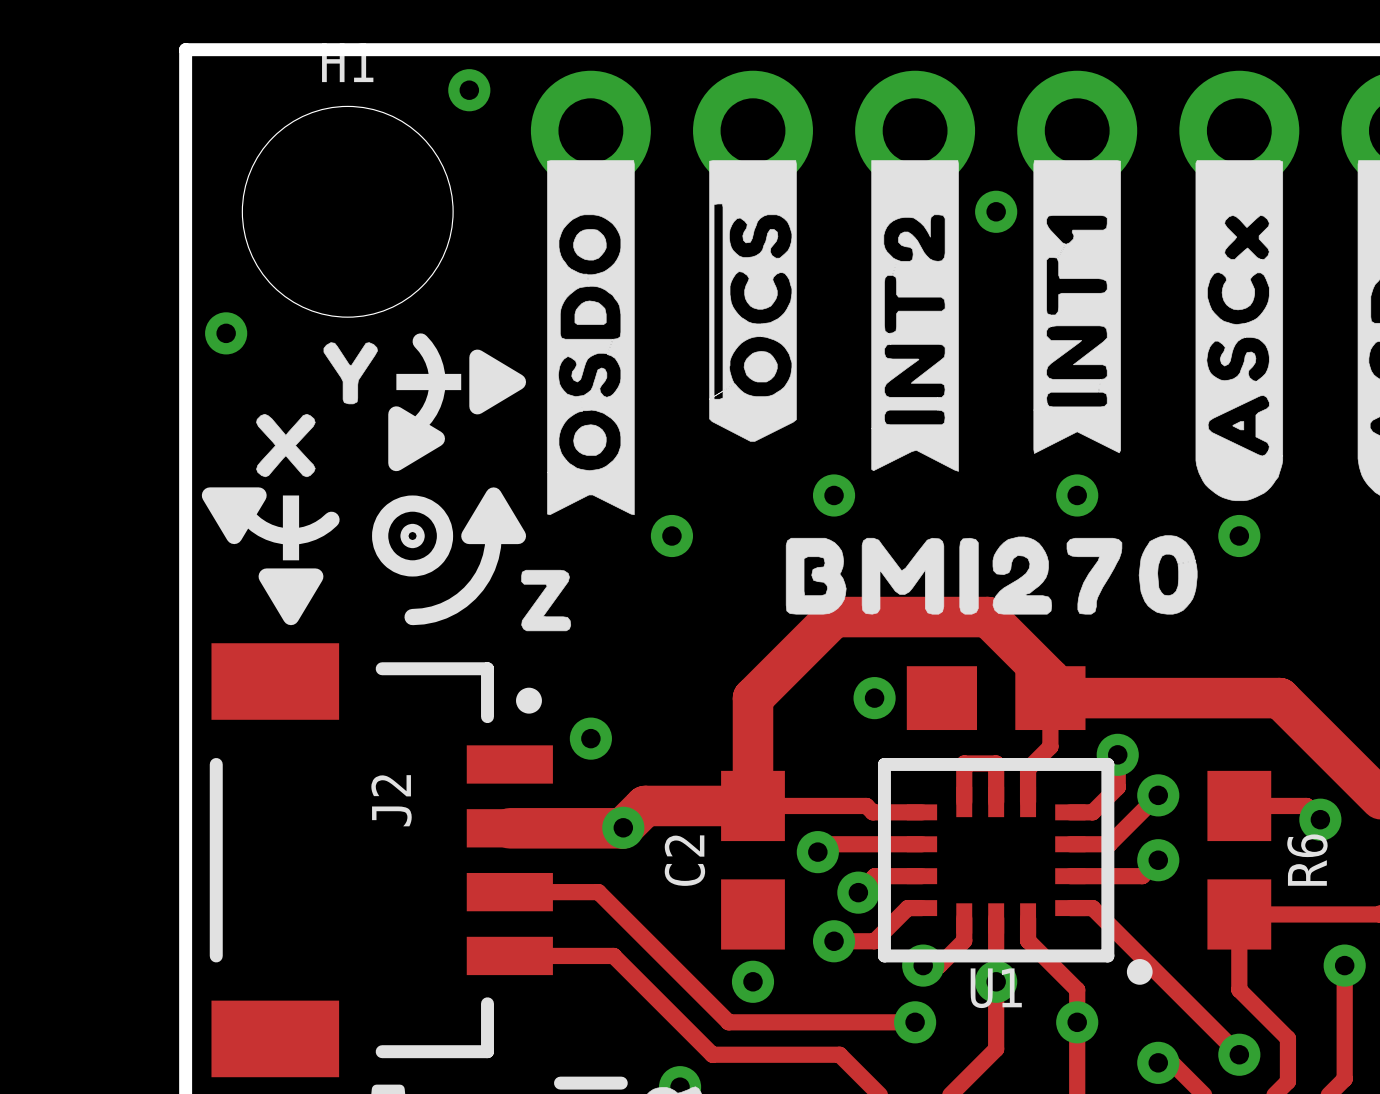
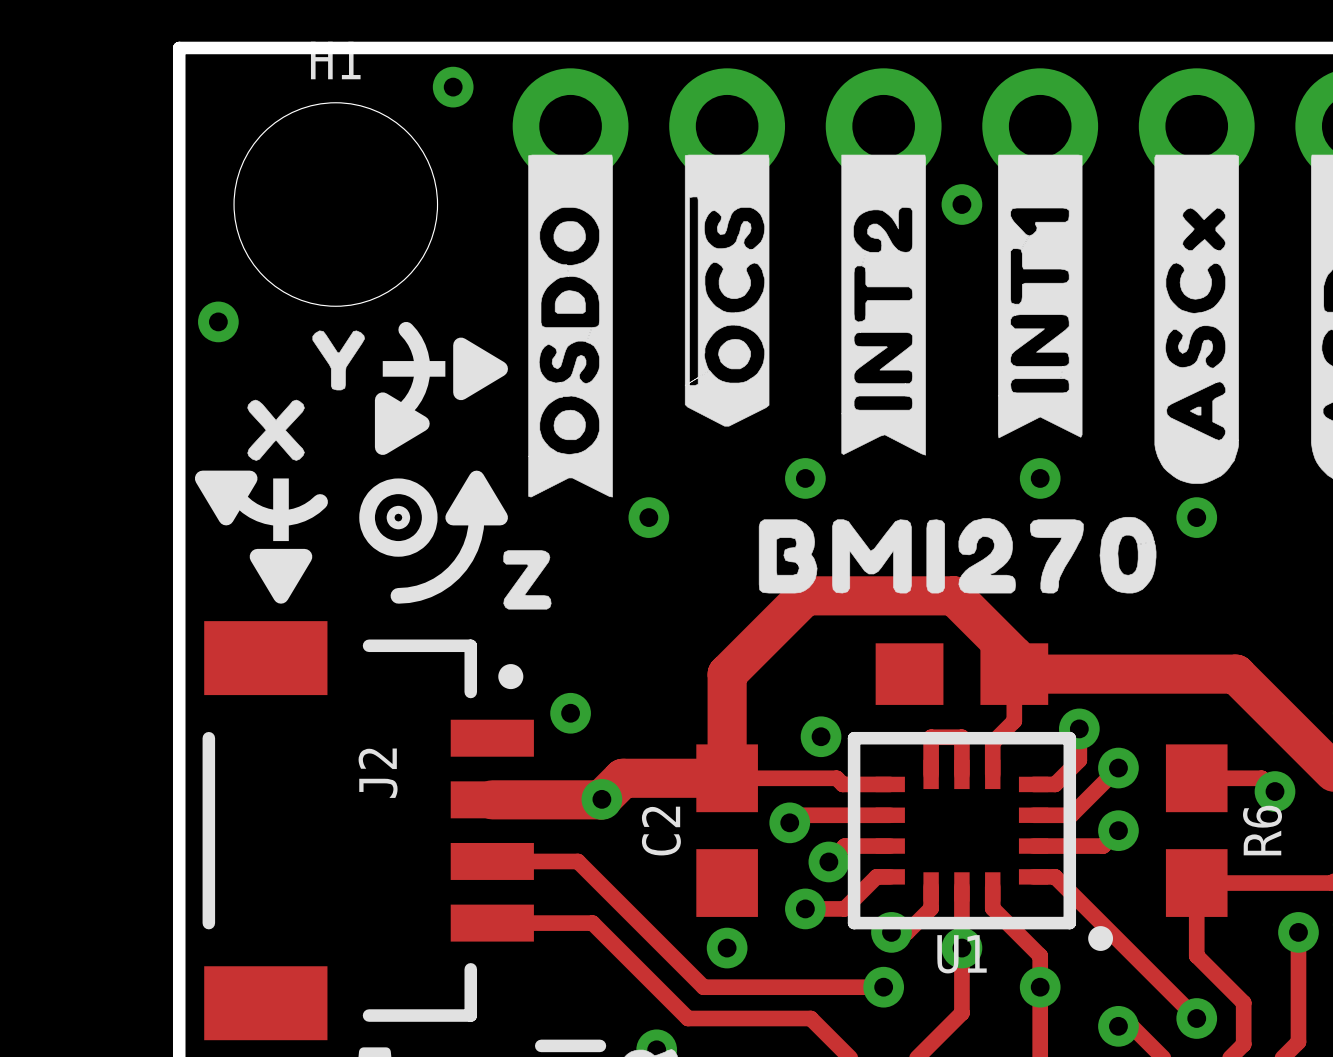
via position: (874, 698) -> (821, 736)

